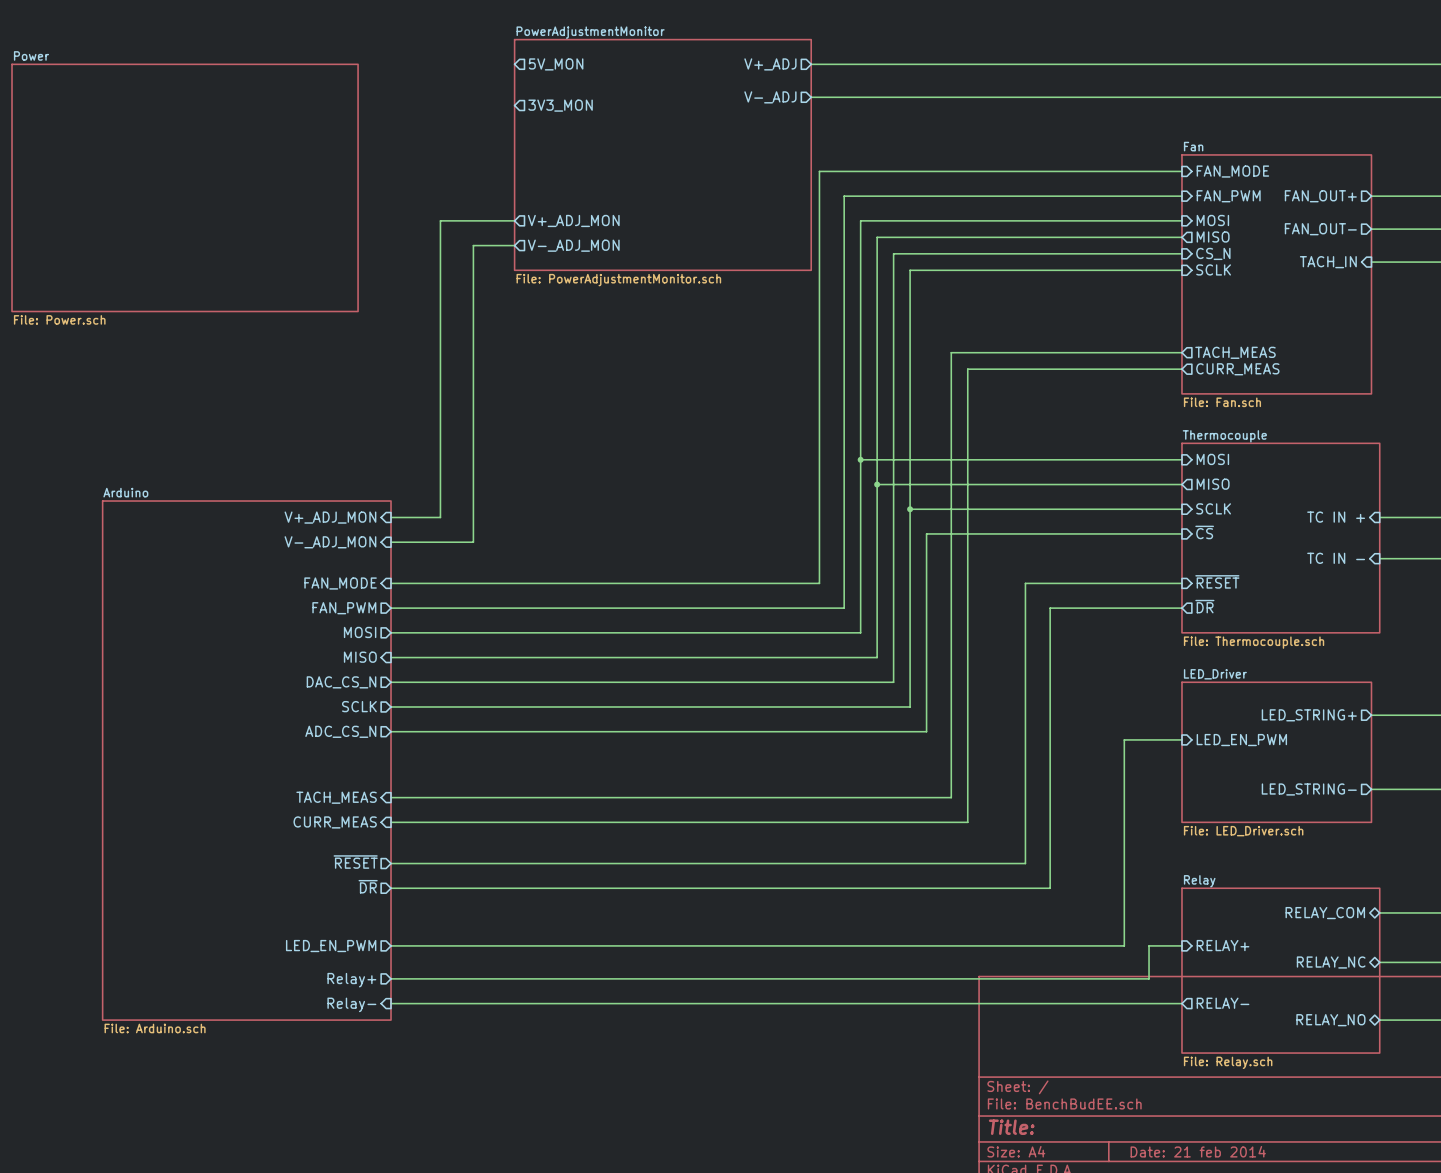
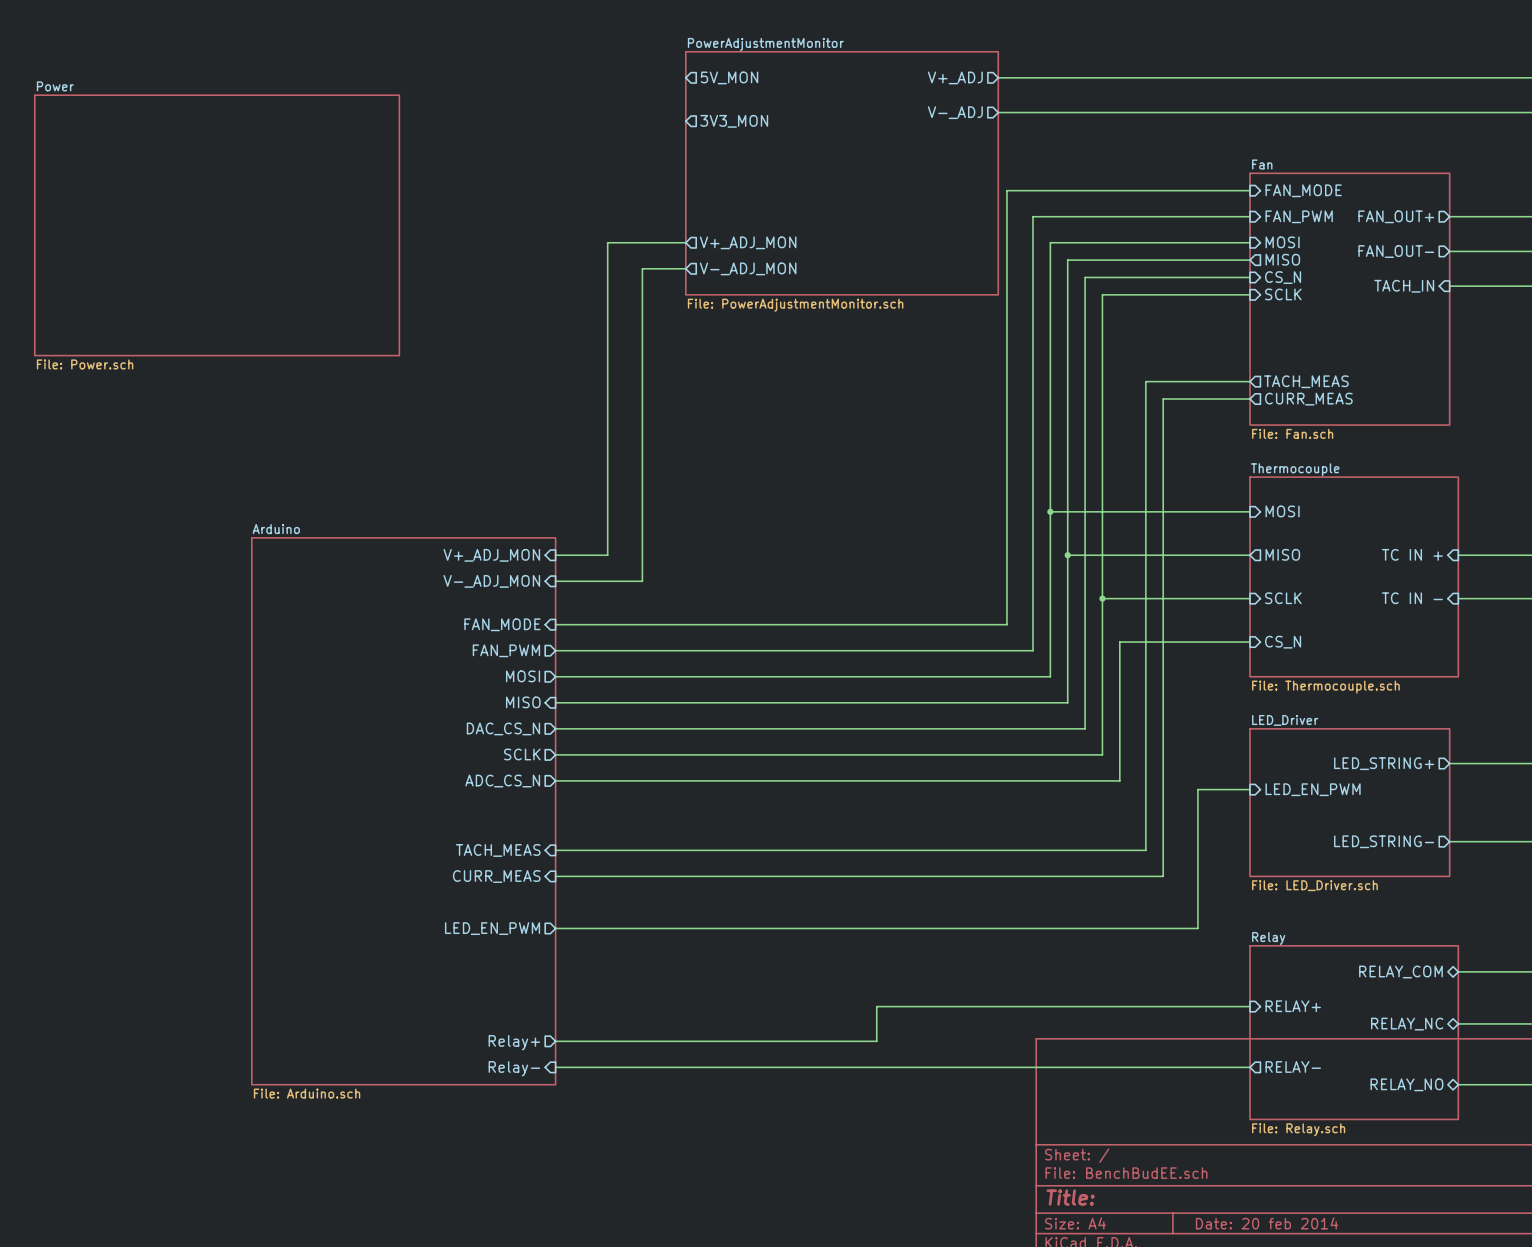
sheet pin position: 5V_MON (556, 64) -> 5V_MON (729, 77)
sheet pin position: V+_ADJ (770, 64) -> V+_ADJ (955, 77)
wire: (811, 64) (943, 64) -> none
sheet pin position: V-_ADJ (770, 97) -> V-_ADJ (955, 112)
wire: (811, 97) (943, 97) -> none
sheet pin position: 3V3_MON (560, 105) -> 3V3_MON (734, 121)
sheet PowerAdjustmentMonitor position: (662, 154) -> (842, 173)
wire: (951, 171) (819, 171) (819, 583) -> none
sheet Power position: (185, 187) -> (217, 225)
wire: (976, 196) (844, 196) (844, 608) -> (1033, 216) (1033, 650) (894, 650)
wire: (514, 220) (440, 220) (440, 517) (391, 517) -> (685, 242) (607, 242) (607, 555) (555, 555)
sheet pin position: V+_ADJ_MON (573, 220) -> V+_ADJ_MON (748, 242)
wire: (992, 220) (860, 220) (860, 632) -> (1050, 242) (1050, 676) (911, 676)
wire: (1008, 237) (877, 237) (877, 657) -> (1067, 260) (1067, 702) (928, 702)
wire: (514, 245) (473, 245) (473, 542) (391, 542) -> (685, 268) (642, 268) (642, 581) (555, 581)
sheet pin position: V-_ADJ_MON (573, 245) -> V-_ADJ_MON (748, 268)
wire: (1025, 253) (893, 253) (893, 682) -> (1085, 277) (1085, 624)
wire: (1041, 270) (910, 270) (910, 706) -> (1102, 294) (1102, 754) (963, 754)
wire: (951, 352) (1083, 352) -> (1006, 381) (1006, 190)
wire: none -> (1145, 381) (1145, 850) (1006, 850)
wire: (1099, 369) (967, 369) (967, 822) -> (1163, 398) (1163, 876) (1024, 876)
wire: (860, 459) (1181, 459) -> none
junction: (860, 459) -> none
sheet pin position: MOSI (1212, 459) -> MOSI (1282, 511)
wire: none -> (1050, 511) (1250, 511)
junction: none -> (1050, 511)
wire: (877, 484) (1181, 484) -> none
junction: (877, 484) -> none
sheet pin position: MISO (1213, 484) -> MISO (1282, 554)
sheet pin position: SCLK (1213, 508) -> SCLK (1283, 598)
wire: (910, 509) (1181, 509) -> none
junction: (910, 509) -> none
sheet pin position: V+_ADJ_MON (330, 517) -> V+_ADJ_MON (491, 555)
wire: none -> (1067, 555) (1250, 555)
junction: none -> (1067, 555)
sheet pin: ~{CS} (1204, 532) -> none
wire: (1181, 533) (926, 533) (926, 731) -> (1250, 642) (1119, 642) (1119, 780) (980, 780)
sheet pin position: V-_ADJ_MON (330, 542) -> V-_ADJ_MON (491, 581)
wire: none -> (1102, 598) (1250, 598)
junction: none -> (1102, 598)
sheet pin: ~{RESET} (1217, 581) -> none
sheet pin position: FAN_MODE (340, 583) -> FAN_MODE (502, 624)
wire: (391, 583) (522, 583) -> none
wire: (951, 583) (951, 797) -> (1006, 624) (868, 624)
wire: (1025, 583) (1181, 583) -> none
sheet pin: none -> CS_N (1283, 642)
sheet pin: ~{DR} (1204, 606) -> none
sheet pin position: FAN_PWM (344, 608) -> FAN_PWM (506, 650)
wire: (391, 608) (522, 608) -> none
wire: (1181, 608) (1050, 608) (1050, 888) (391, 888) -> none
sheet pin position: MOSI (360, 632) -> MOSI (523, 676)
wire: (391, 632) (522, 632) -> none
sheet pin position: MISO (360, 657) -> MISO (523, 702)
wire: (391, 657) (522, 657) -> none
sheet pin position: DAC_CS_N (341, 682) -> DAC_CS_N (503, 728)
wire: (391, 682) (522, 682) -> none
wire: (1025, 682) (1025, 863) (391, 863) -> (1085, 728) (946, 728)
sheet pin position: SCLK (359, 706) -> SCLK (522, 754)
wire: (391, 706) (522, 706) -> none
sheet pin position: ADC_CS_N (340, 731) -> ADC_CS_N (502, 781)
wire: (391, 731) (522, 731) -> none
wire: (1132, 739) (1124, 739) (1124, 945) -> (1215, 1006) (1189, 1006)
wire: none -> (1197, 789) (1197, 928) (555, 928)
sheet Arduino position: (246, 760) -> (403, 811)
sheet pin position: TACH_MEAS (336, 797) -> TACH_MEAS (498, 850)
wire: (391, 797) (522, 797) -> none
sheet pin position: CURR_MEAS (335, 822) -> CURR_MEAS (496, 876)
wire: (391, 822) (522, 822) -> none
sheet pin: ~{RESET} (355, 862) -> none
sheet pin: ~{DR} (368, 886) -> none
wire: (391, 945) (827, 945) -> none
wire: (1149, 945) (1149, 978) (827, 978) -> (876, 1006) (876, 1041)
sheet pin position: LED_EN_PWM (331, 946) -> LED_EN_PWM (492, 928)
wire: (391, 978) (522, 978) -> none
sheet pin position: Relay+ (351, 980) -> Relay+ (514, 1042)
wire: (391, 1003) (522, 1003) -> none
sheet pin position: Relay- (351, 1004) -> Relay- (514, 1068)
title block: Date: 21 feb 2014 (1198, 1151) -> Date: 20 feb 2014 (1267, 1223)

